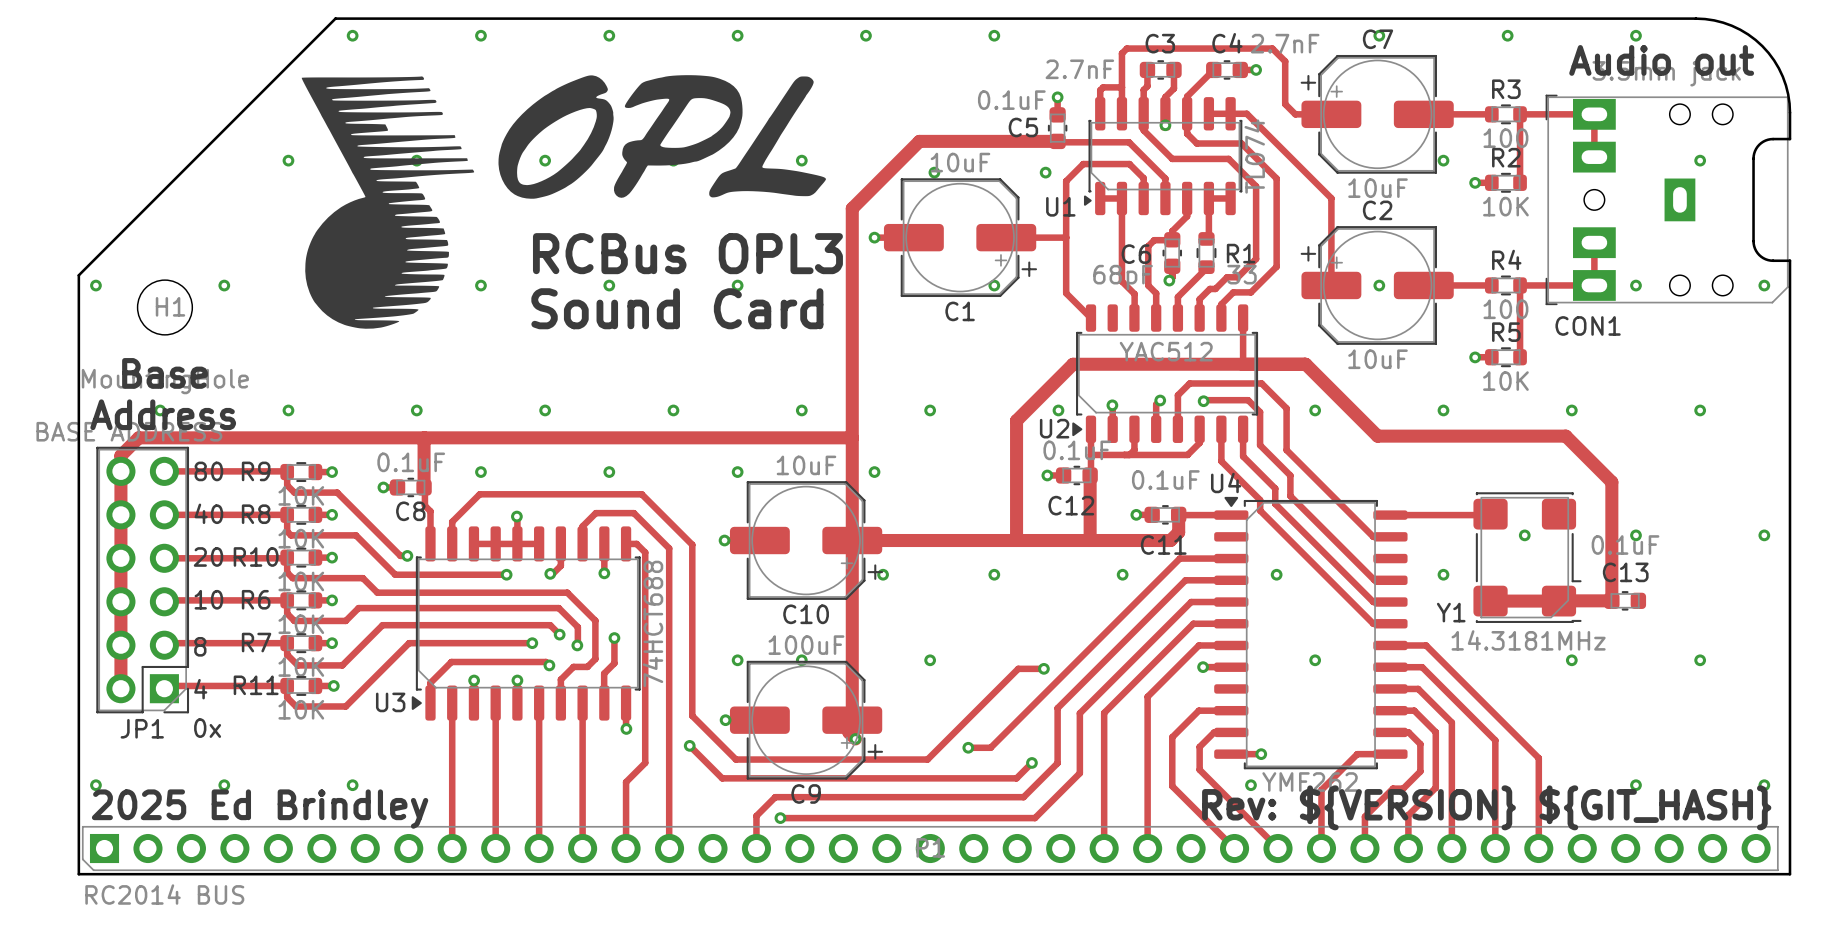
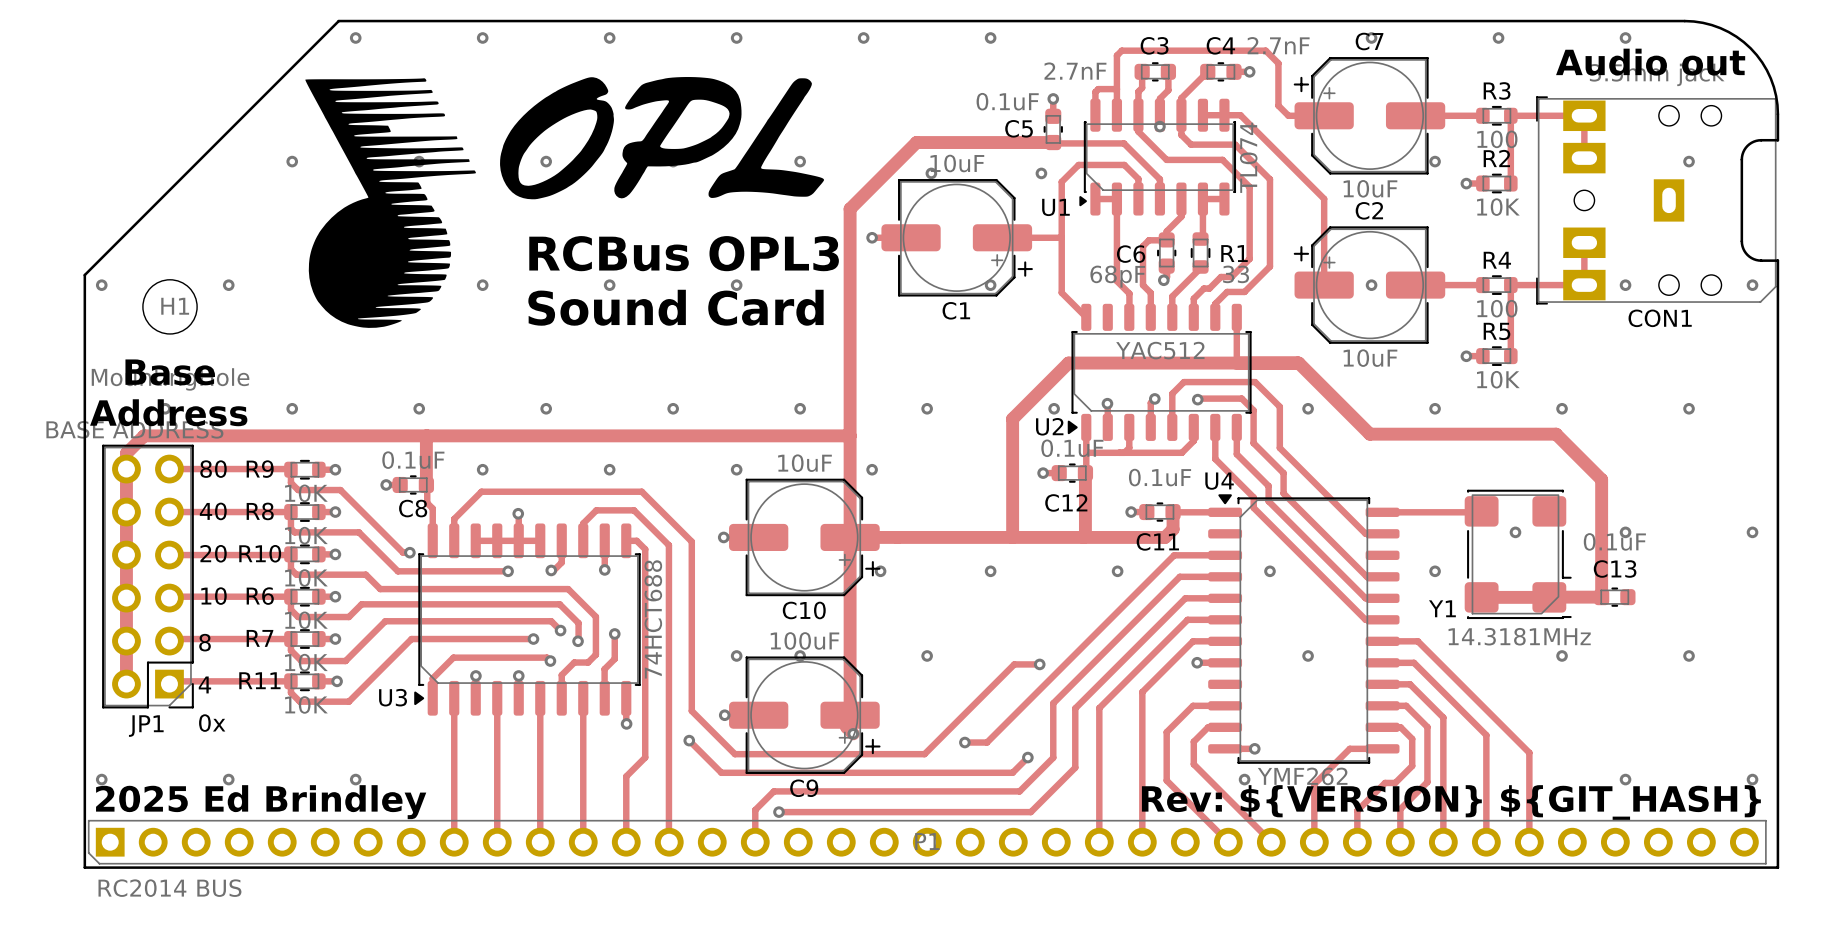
CON1 name position: CON1 (1588, 325) -> CON1 (1660, 318)

